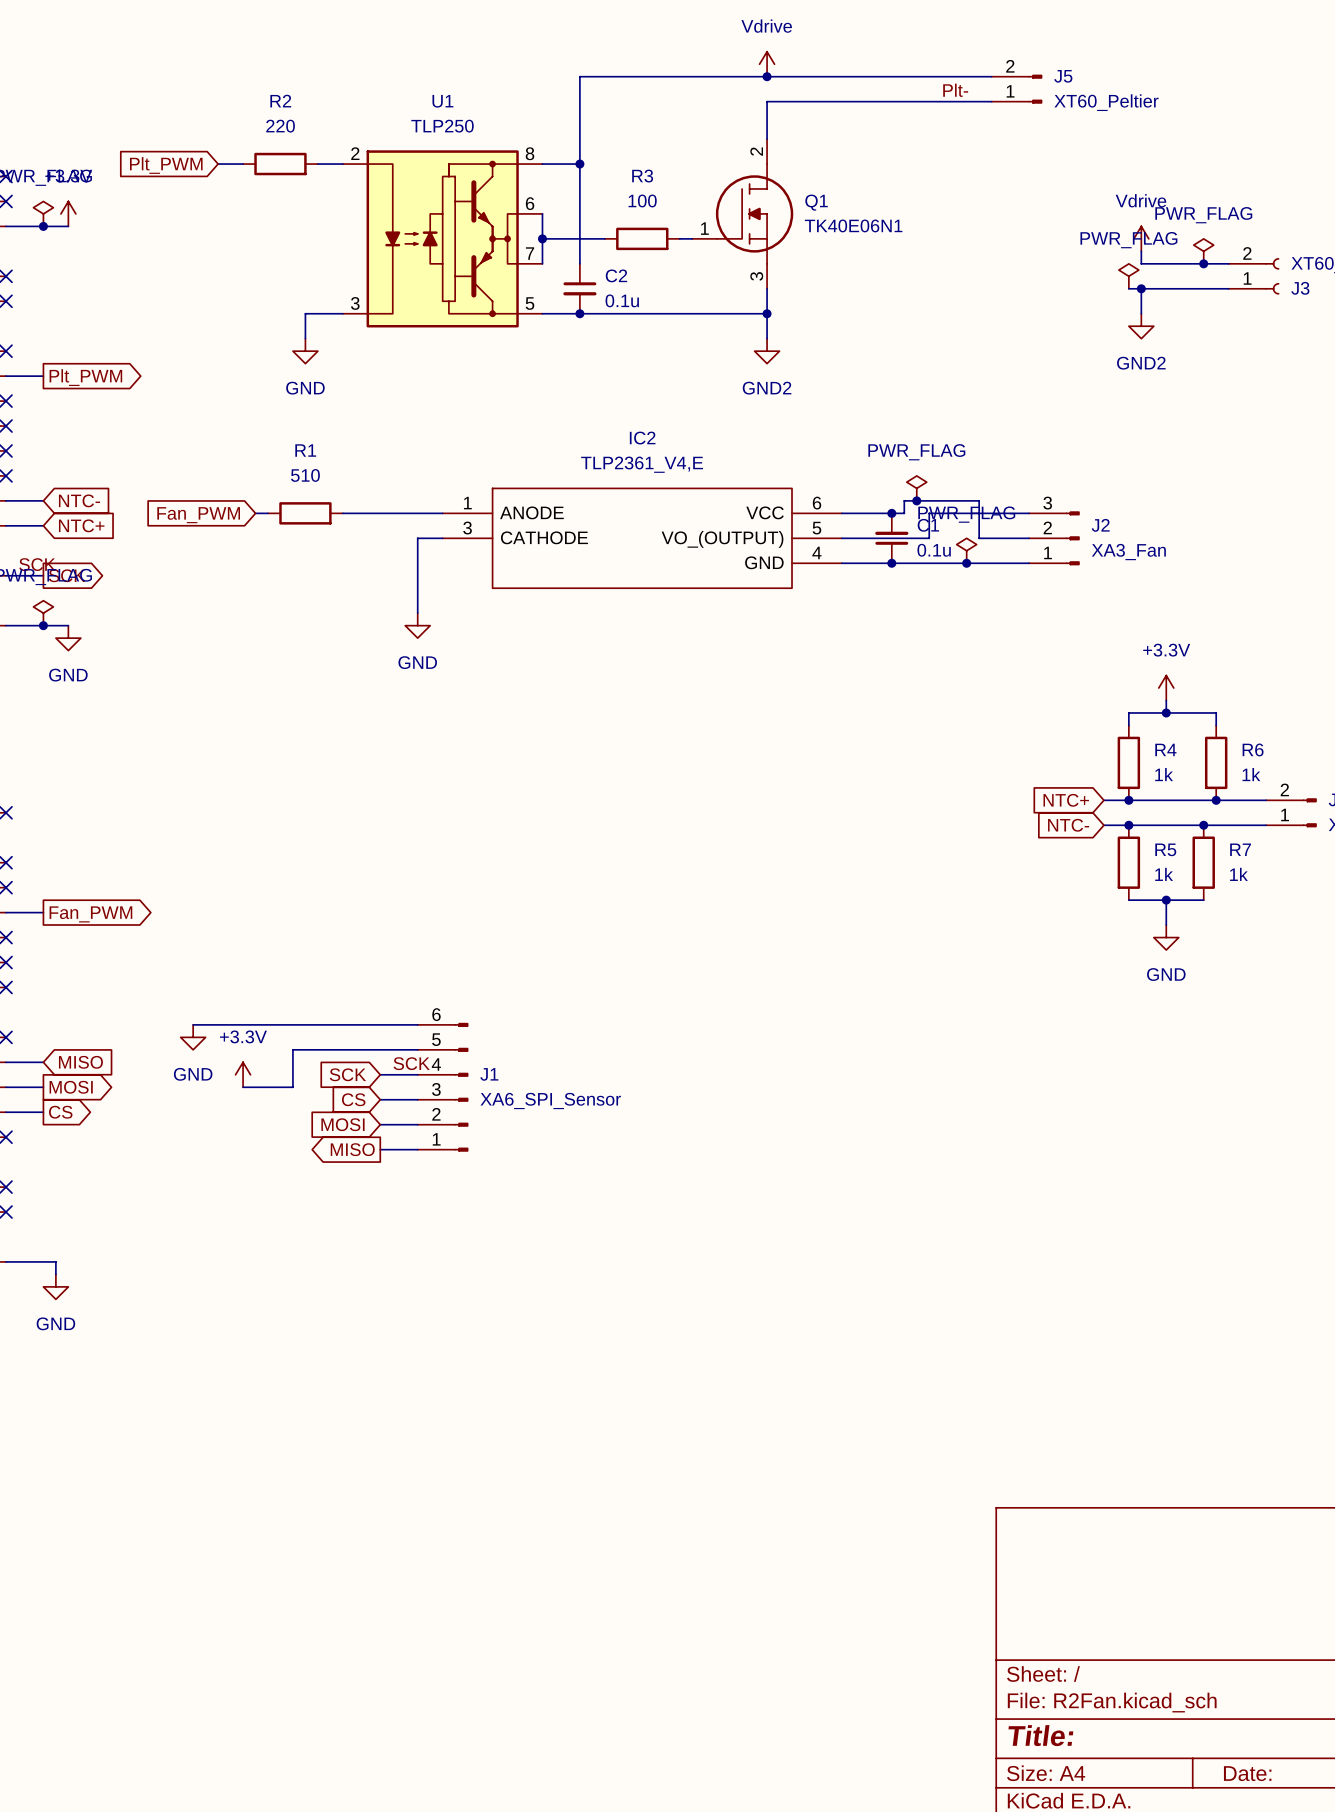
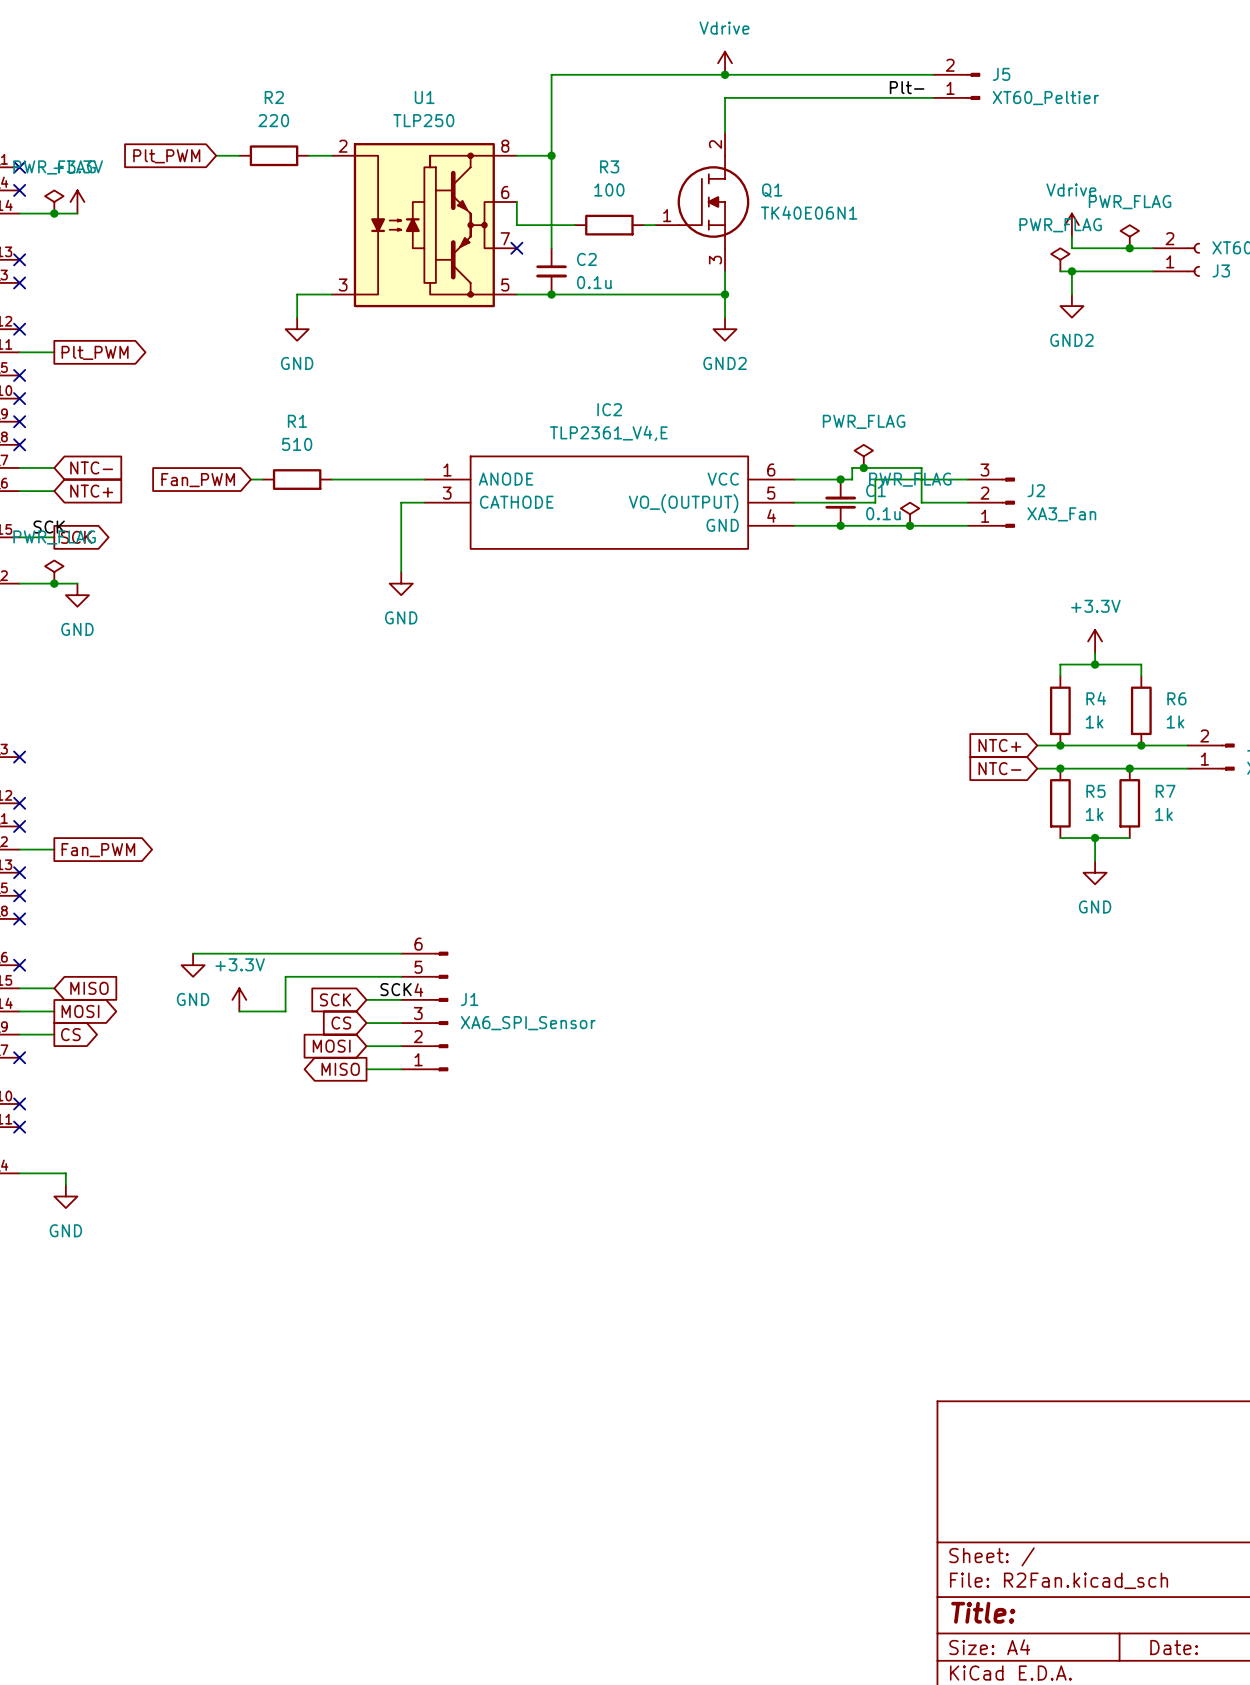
wire: (542, 238) (542, 263) -> none
junction: (542, 238) -> none
no-connect mark: none -> (516, 248)

